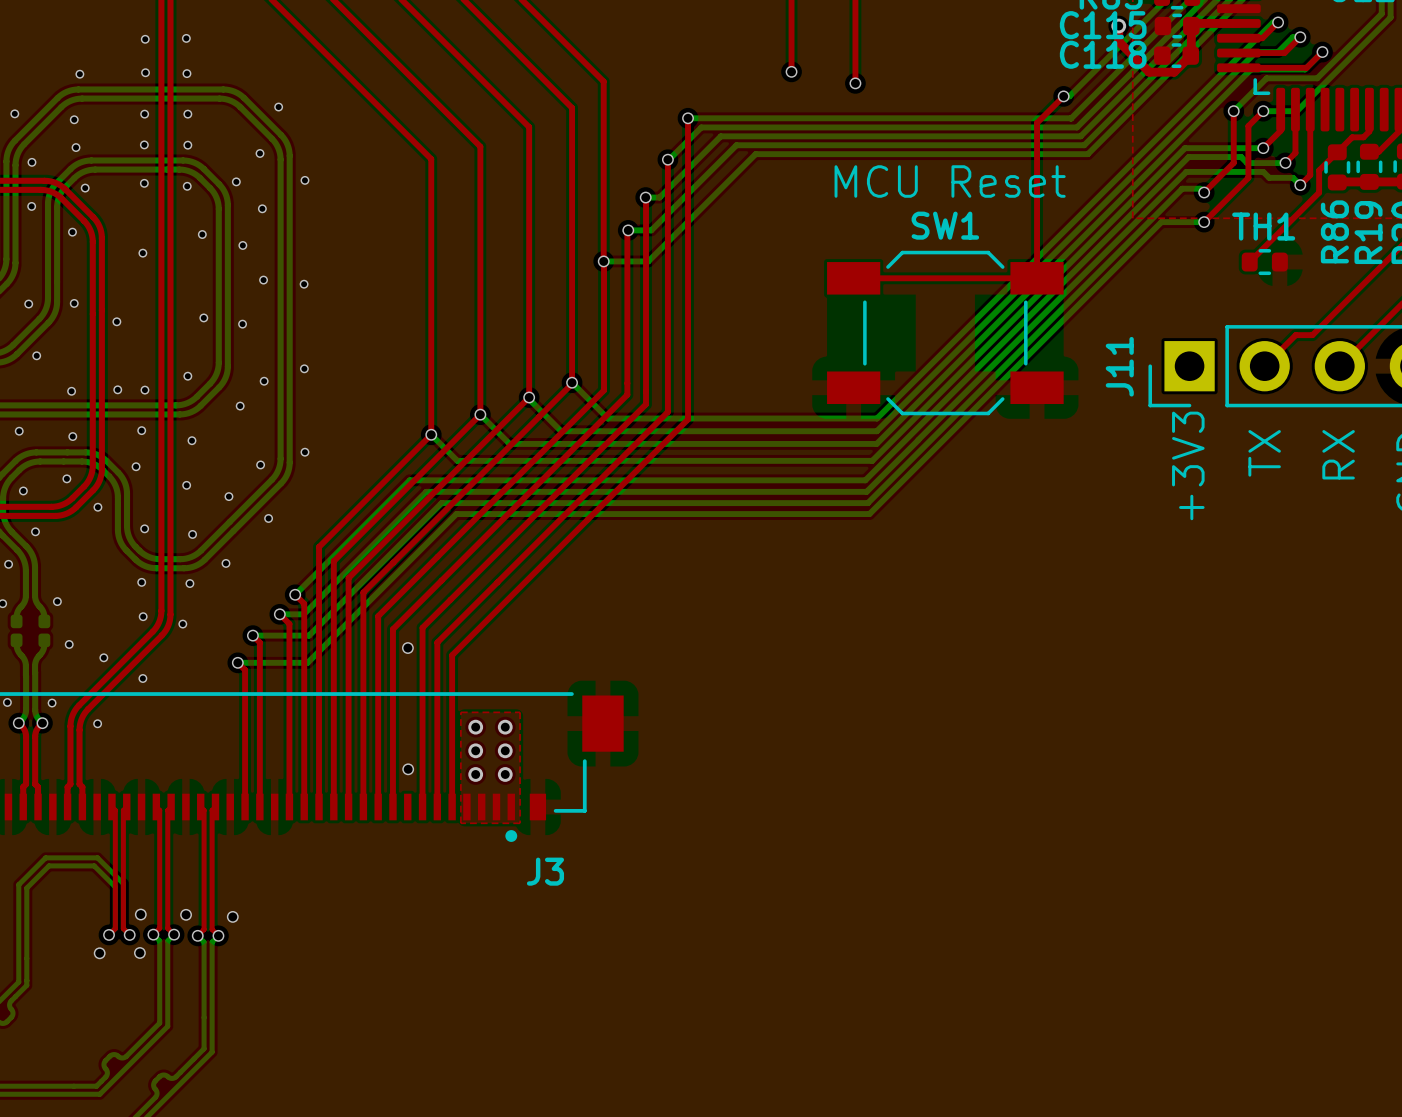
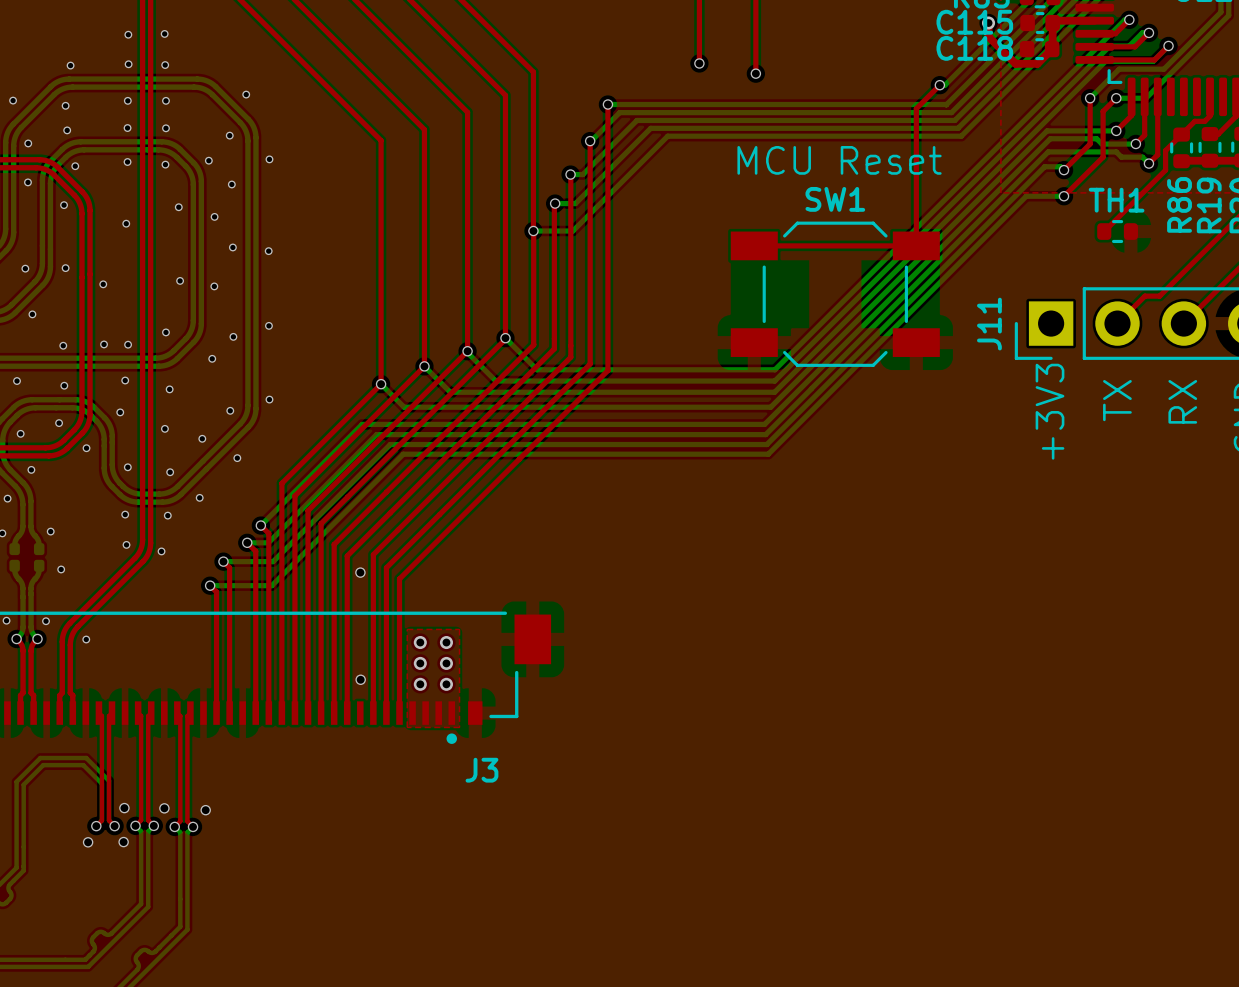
via: (103, 657) -> none
via: (142, 678) -> none

